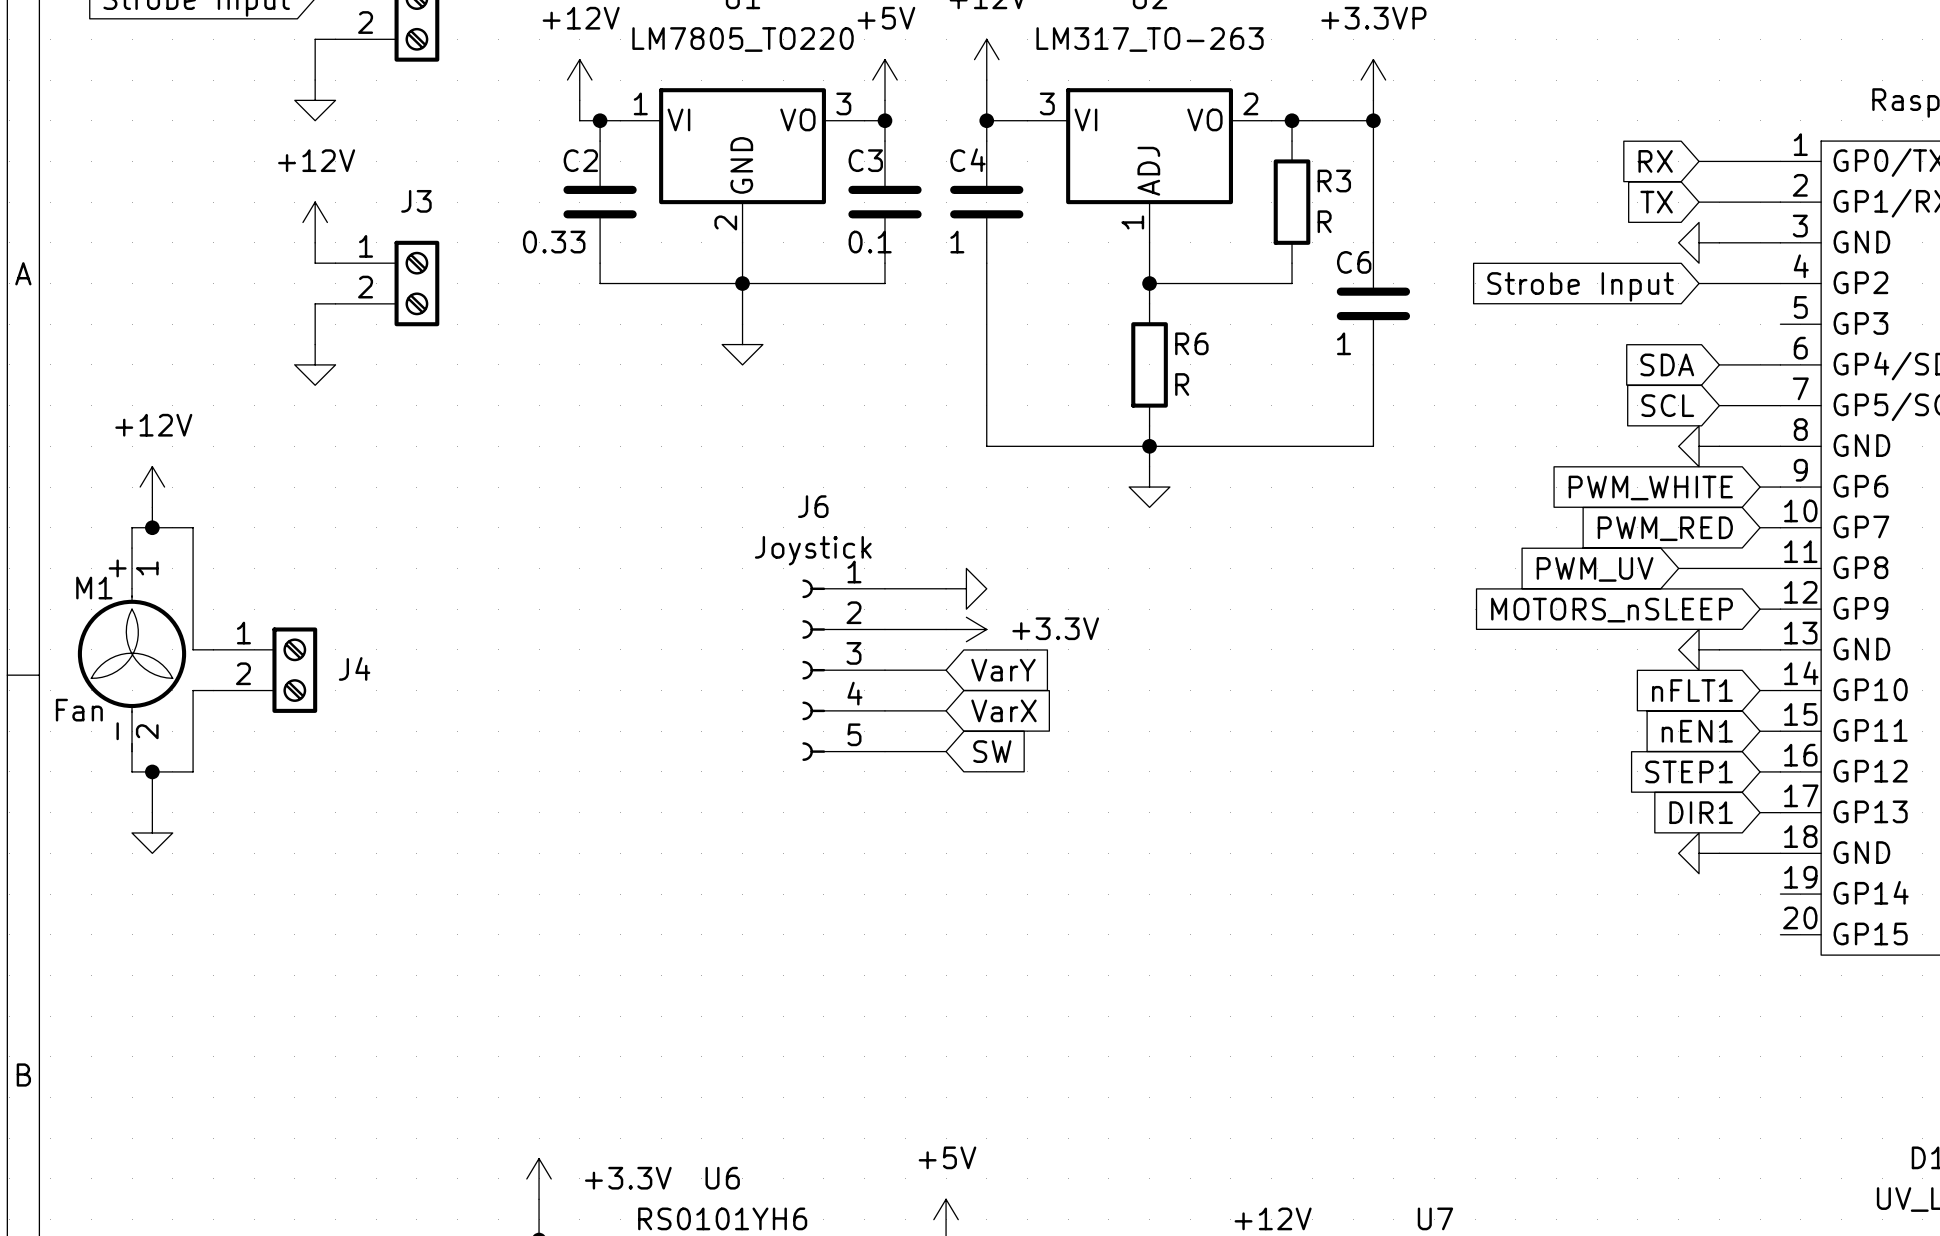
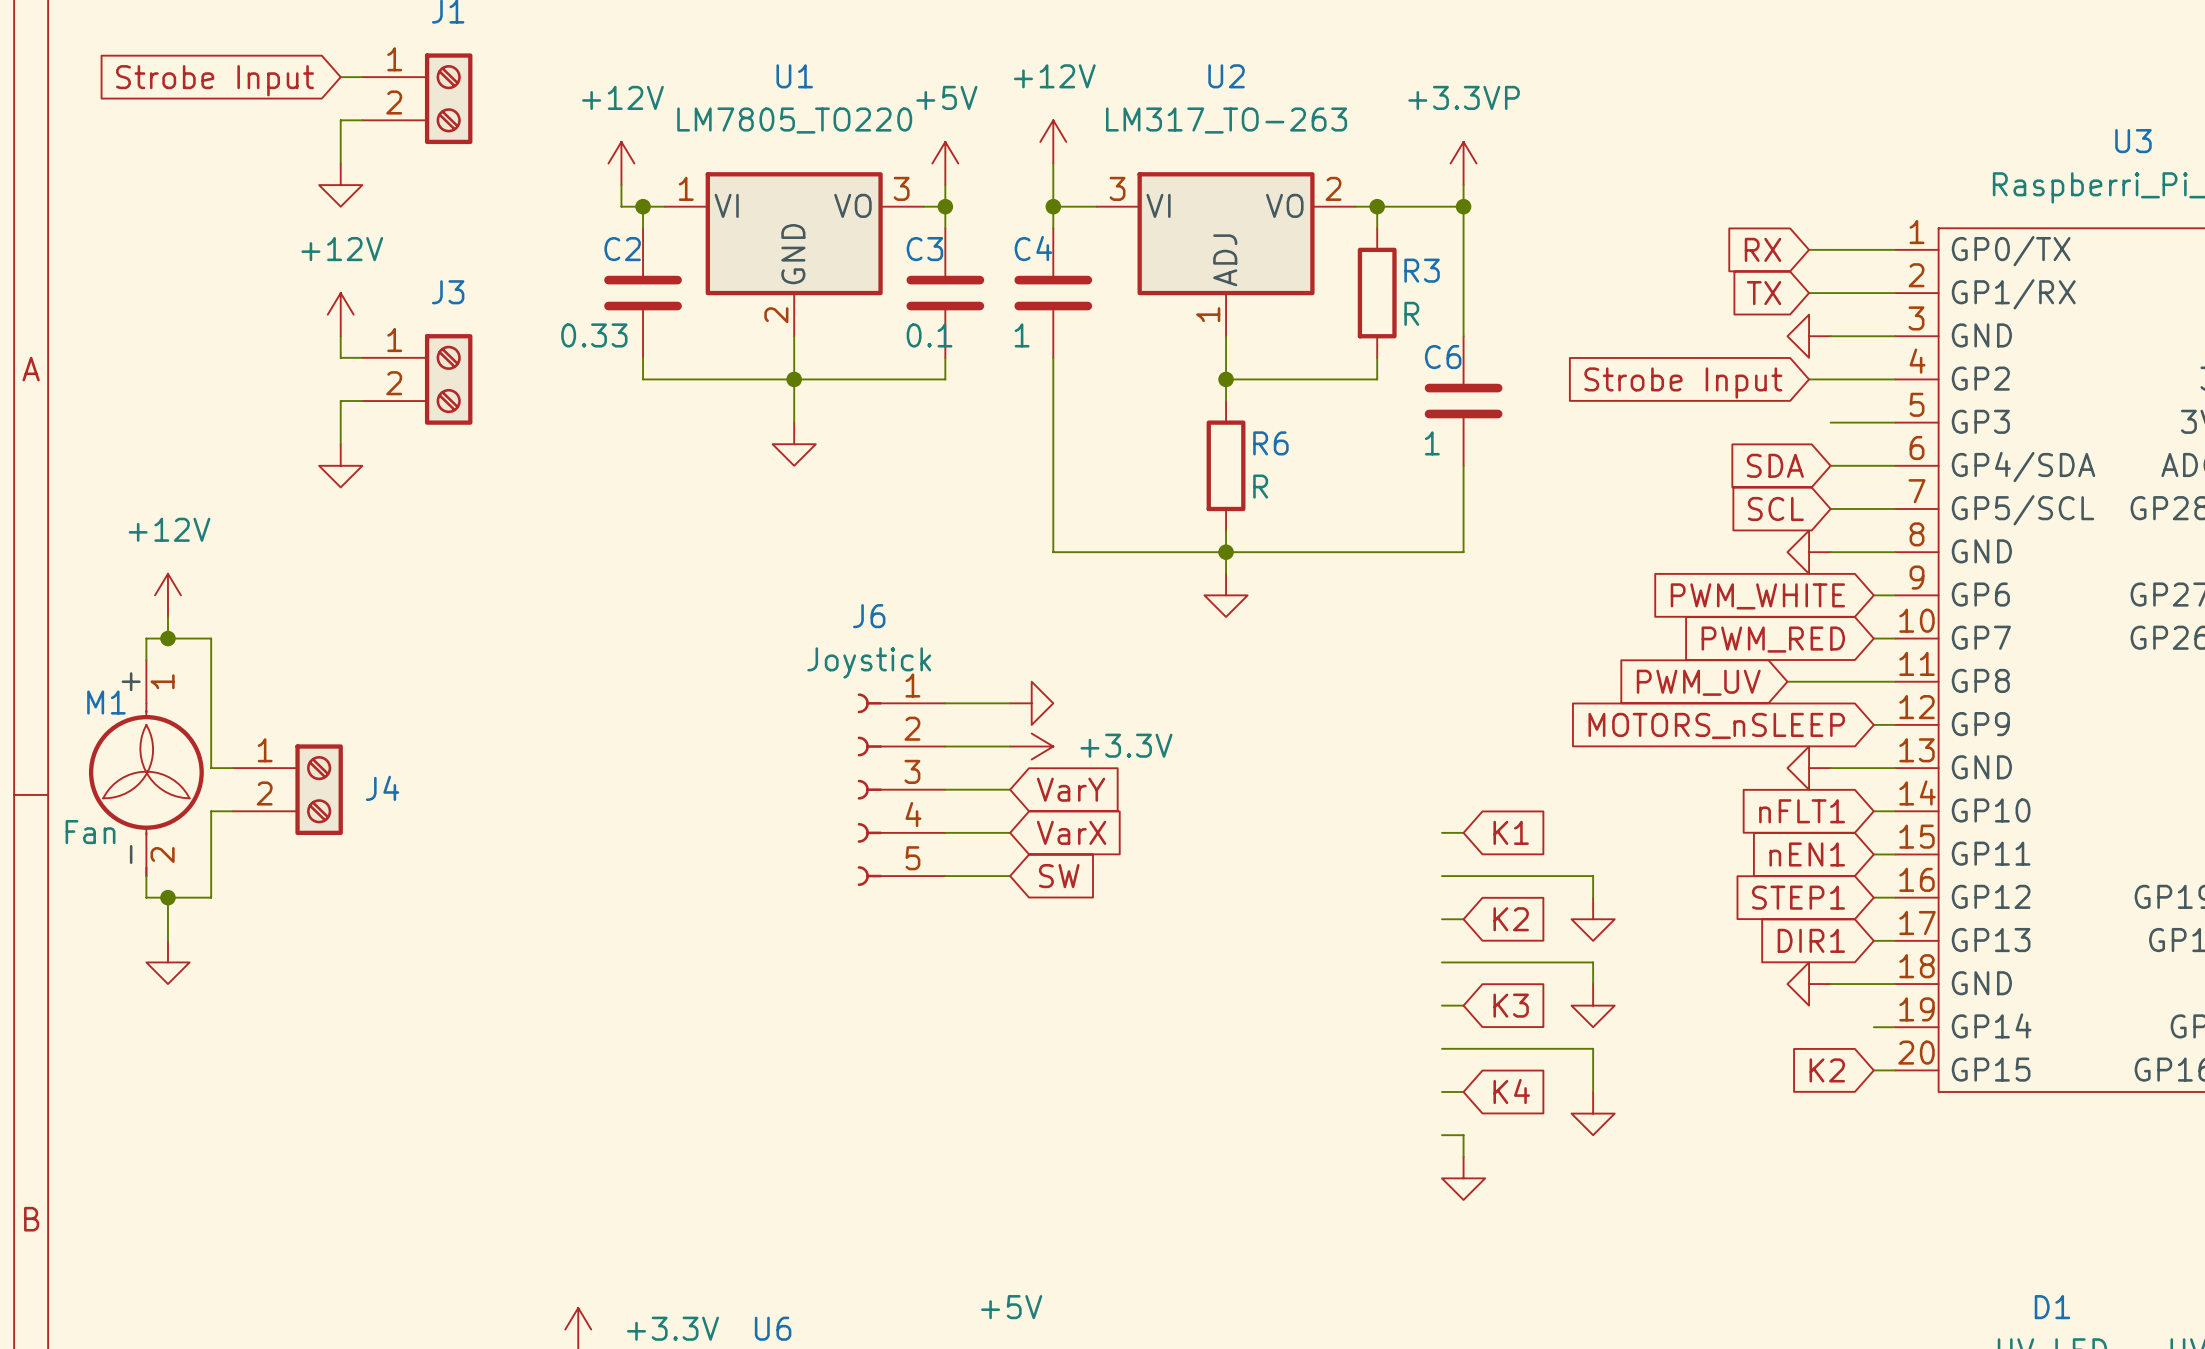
wire: none -> (1830, 422) (1895, 422)
wire: none -> (1441, 832) (1463, 832)
global label: none -> K1 (1511, 832)
wire: none -> (1441, 876) (1593, 876) (1593, 897)
wire: none -> (1441, 919) (1463, 919)
global label: none -> K2 (1511, 919)
power symbol: none -> (1593, 919)
wire: none -> (1441, 962) (1593, 962) (1593, 984)
wire: none -> (1441, 1005) (1463, 1005)
global label: none -> K3 (1511, 1005)
power symbol: none -> (1593, 1005)
wire: none -> (1873, 1027) (1895, 1027)
wire: none -> (1441, 1048) (1593, 1048) (1593, 1092)
global label: none -> K2 (1827, 1070)
wire: none -> (1873, 1070) (1895, 1070)
global label: none -> K4 (1511, 1091)
wire: none -> (1441, 1092) (1463, 1092)
power symbol: none -> (1593, 1113)
wire: none -> (1441, 1135) (1463, 1135) (1463, 1156)
power symbol: none -> (1463, 1178)

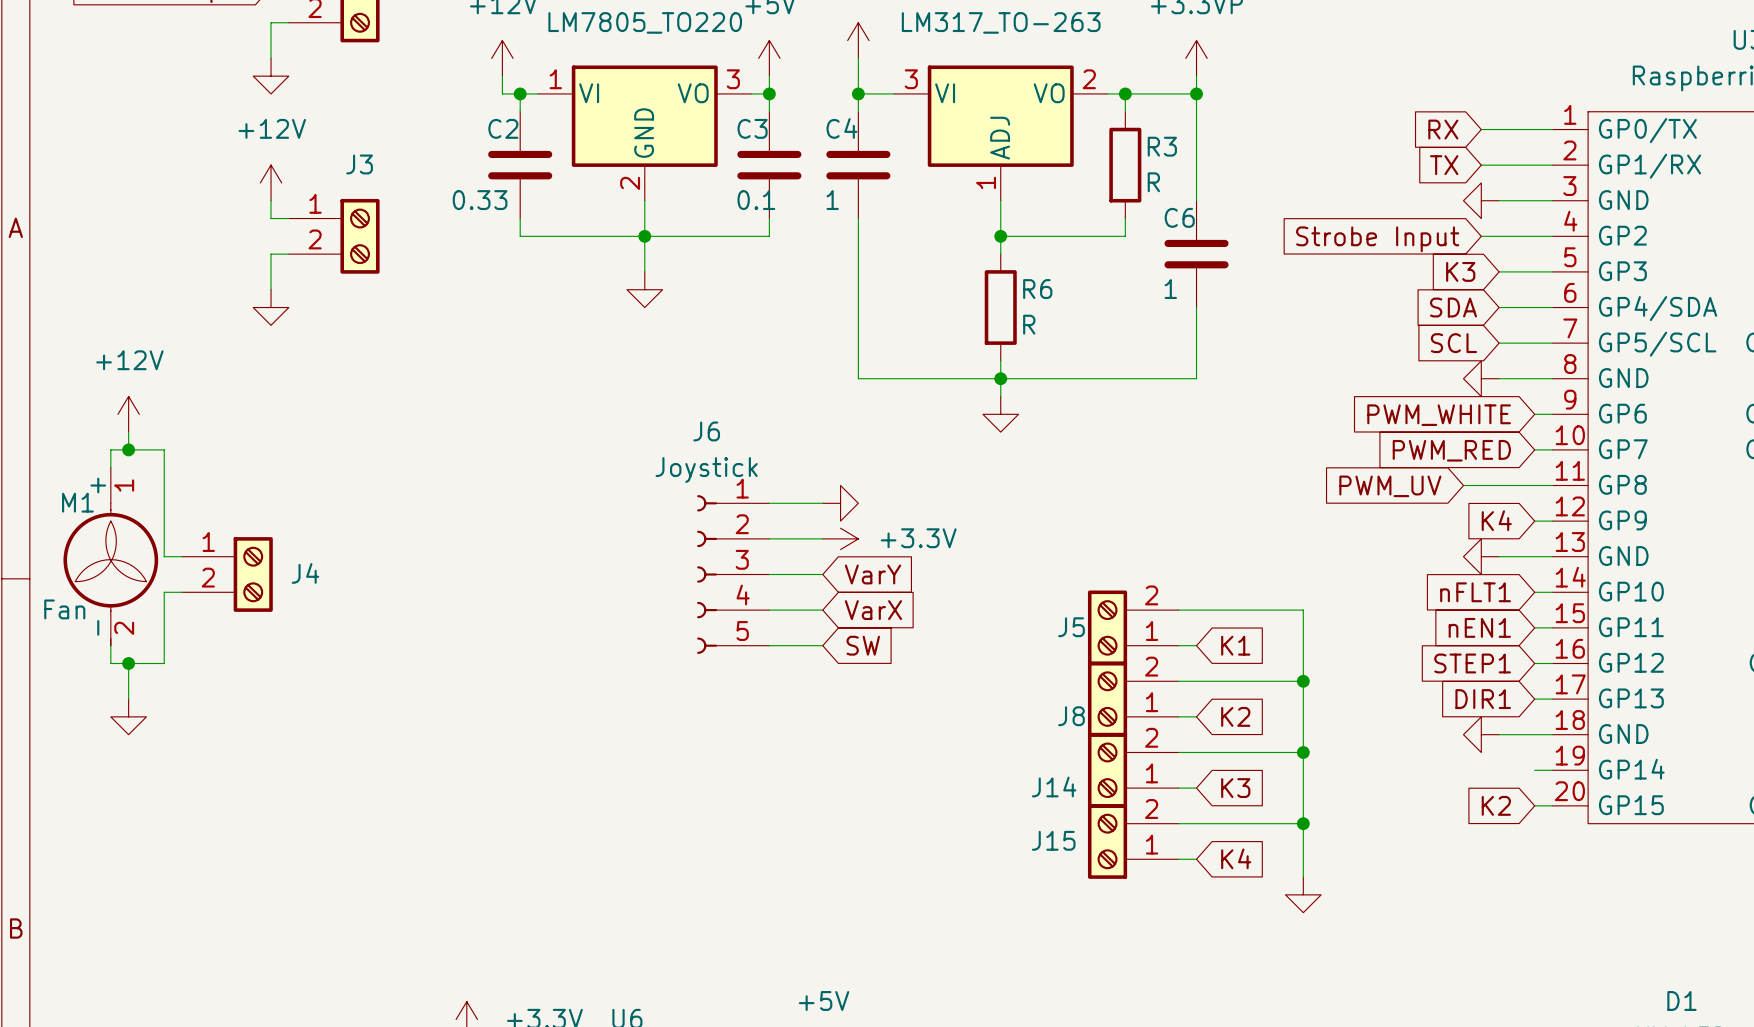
global label: none -> K3 (1460, 271)
global label: MOTORS_nSLEEP (1716, 725) -> K4 (1496, 520)
global label position: K1 (1511, 832) -> K1 (1235, 645)
J5: none -> (1133, 627)
wire: (1463, 876) (1593, 876) -> (1196, 610) (1303, 610) (1303, 645)
wire: none -> (1196, 681) (1303, 681)
global label position: K2 (1511, 919) -> K2 (1235, 716)
power symbol: (1593, 919) -> none
junction: none -> (1303, 681)
J8: none -> (1133, 699)
wire: (1463, 962) (1593, 962) -> (1303, 663) (1303, 716)
wire: none -> (1196, 752) (1303, 752)
global label position: K3 (1511, 1005) -> K3 (1235, 788)
power symbol: (1593, 1005) -> none
junction: none -> (1303, 752)
J14: none -> (1133, 770)
wire: (1463, 1048) (1593, 1048) -> (1303, 734) (1303, 788)
global label position: K4 (1511, 1091) -> K4 (1236, 858)
wire: none -> (1196, 823) (1303, 823) (1303, 877)
junction: none -> (1303, 823)
J15: none -> (1133, 841)
power symbol: (1593, 1113) -> none
wire: (1463, 1135) (1463, 1156) -> none
power symbol: (1463, 1178) -> none
power symbol: none -> (1303, 894)

